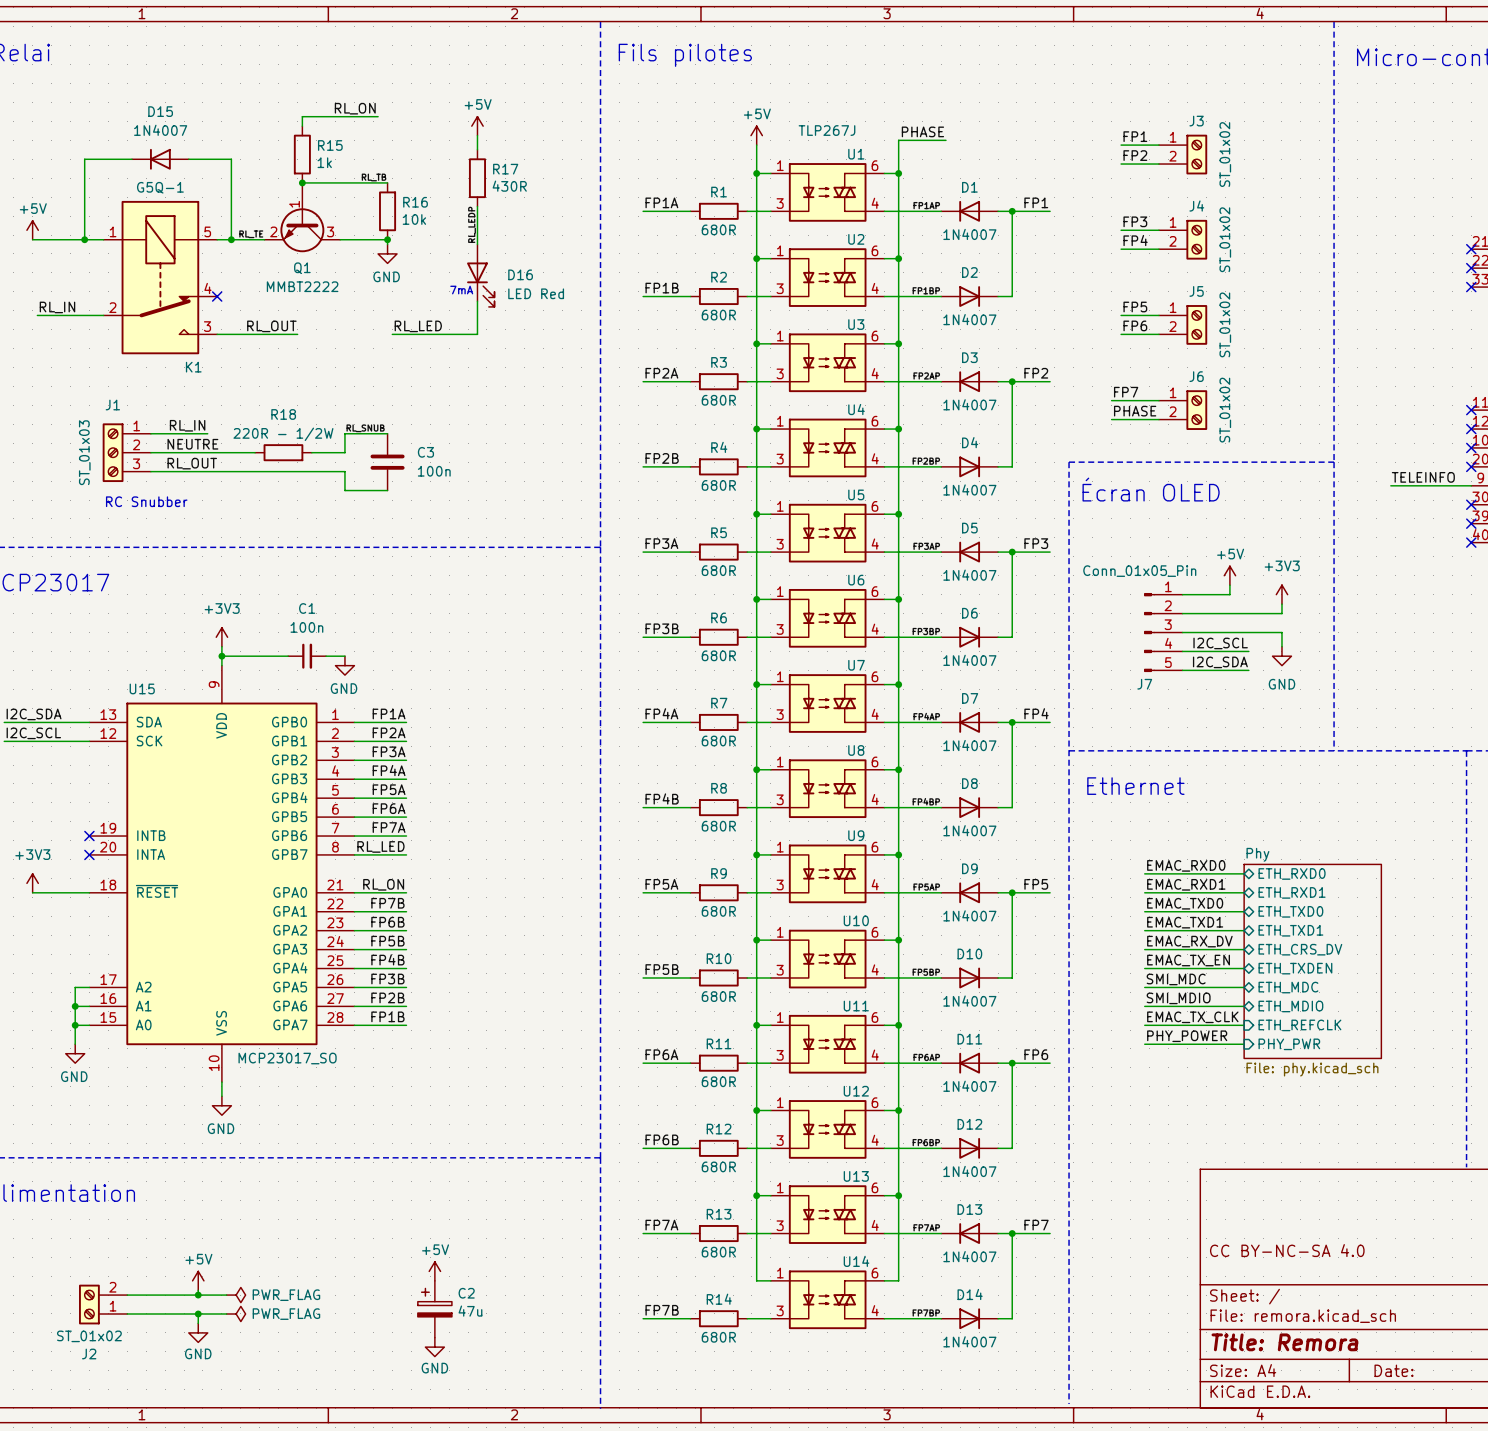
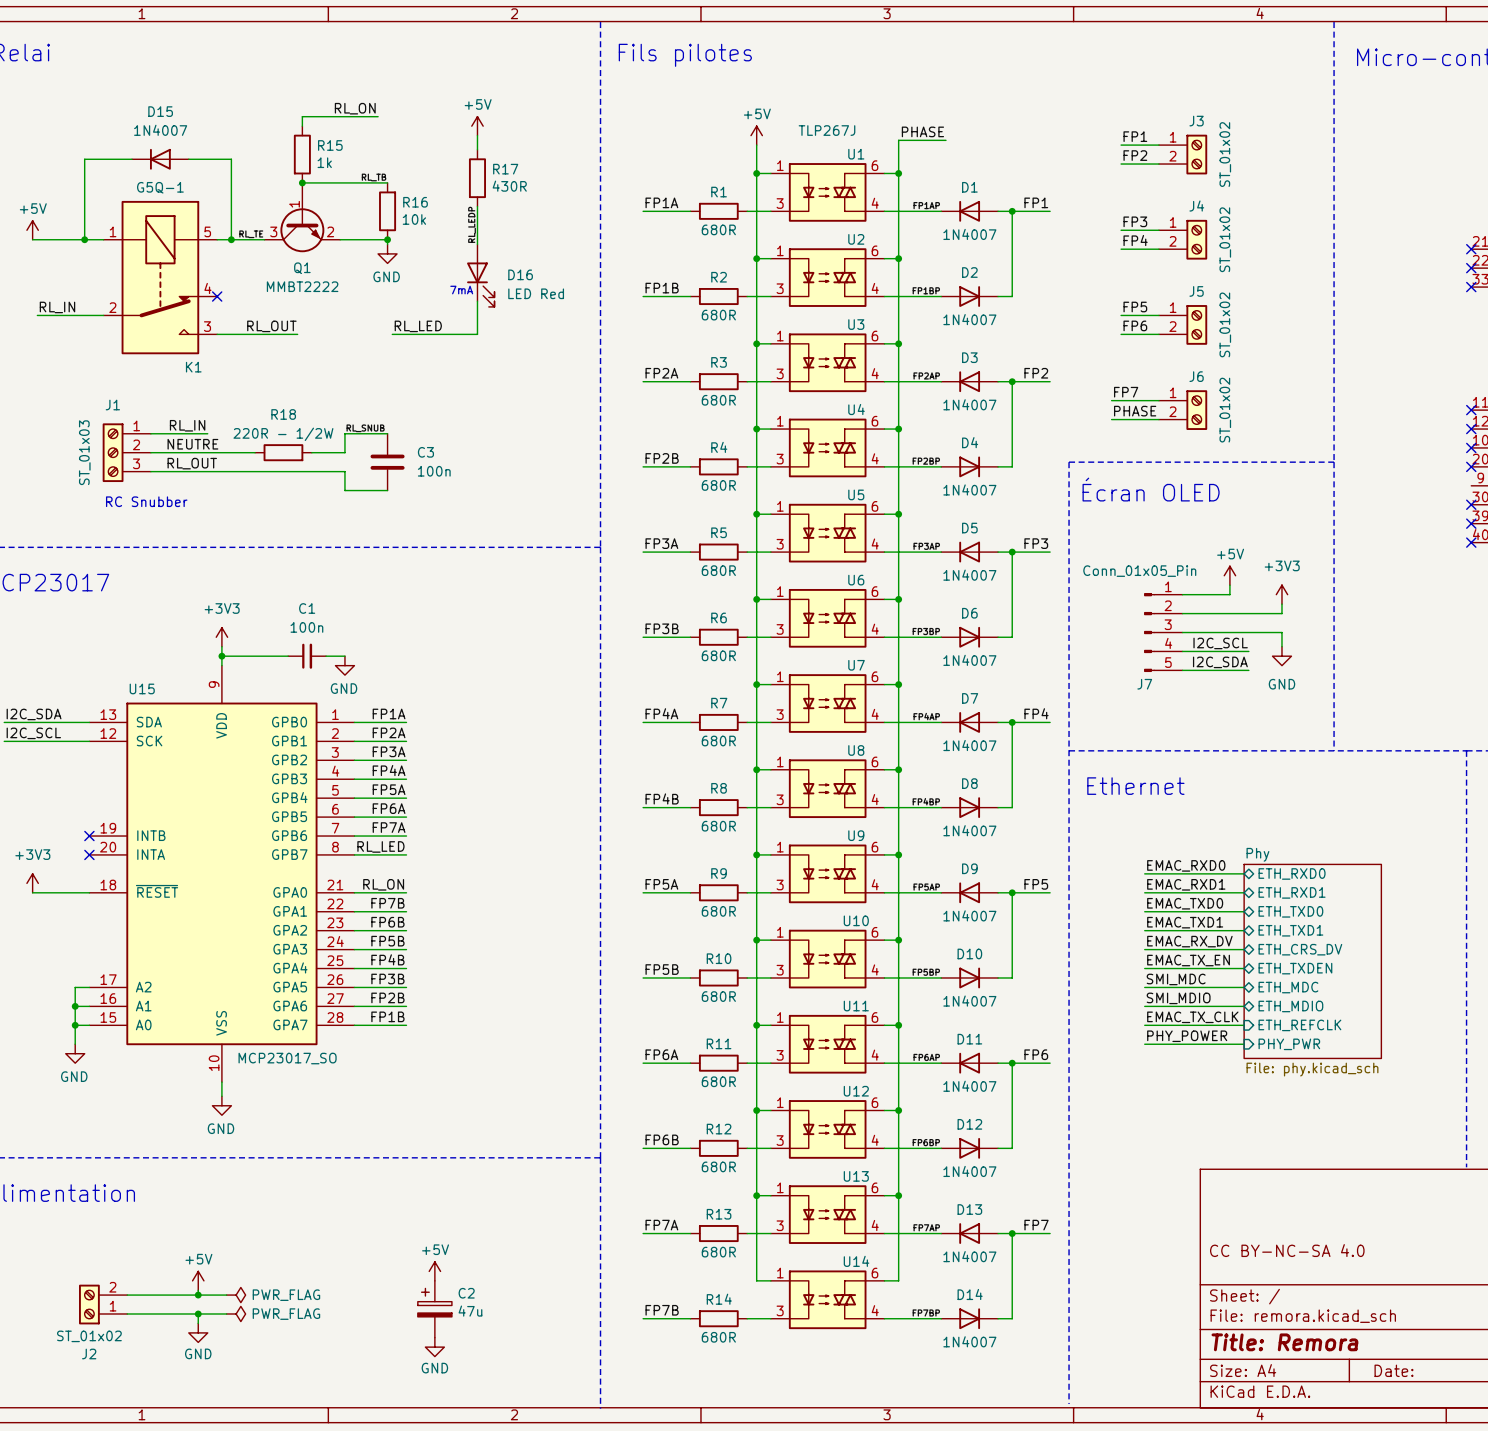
Q1 flip: as is (302, 230) -> left-right (302, 230)
label: TELEINFO (1423, 477) -> none
wire: (1390, 485) (1471, 485) -> none

